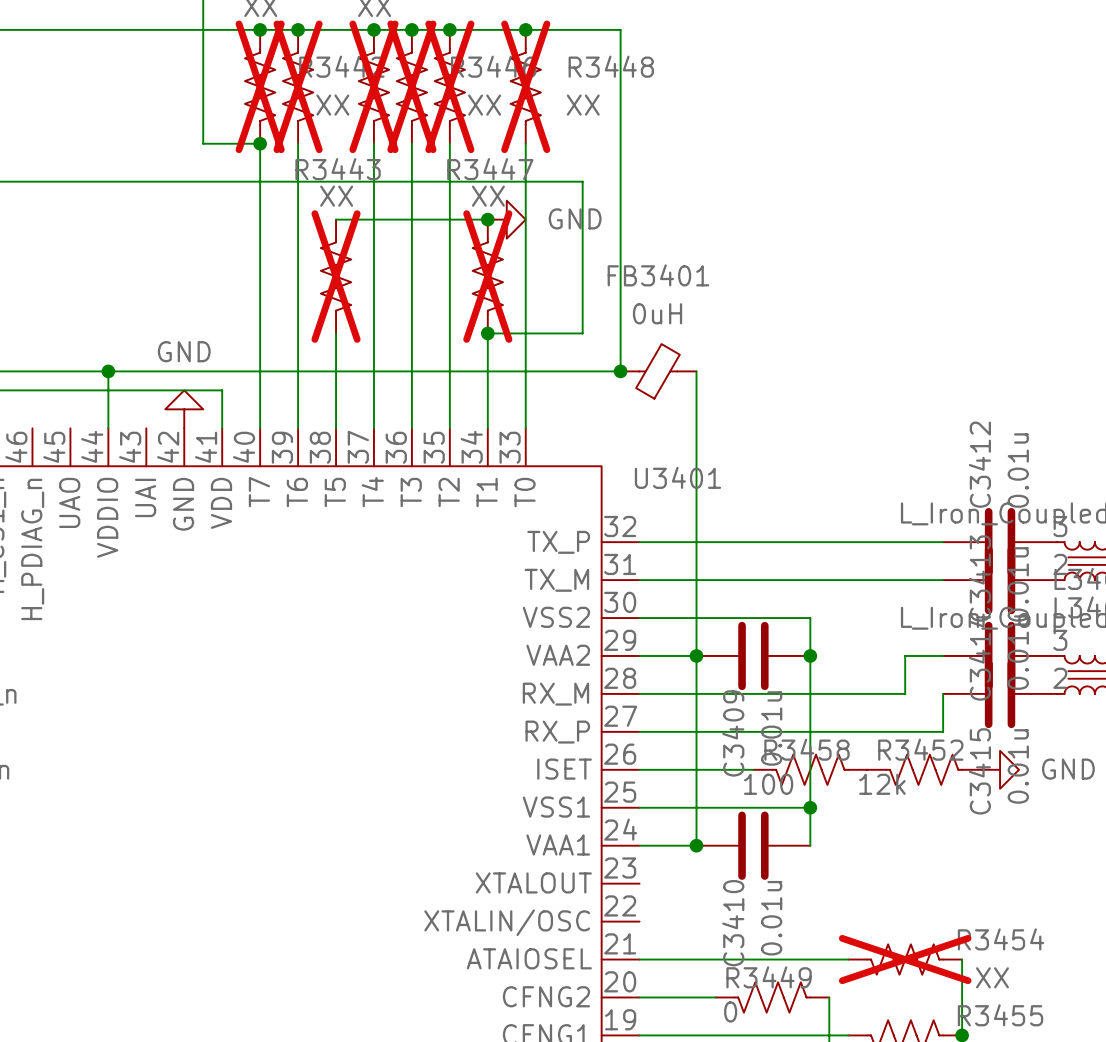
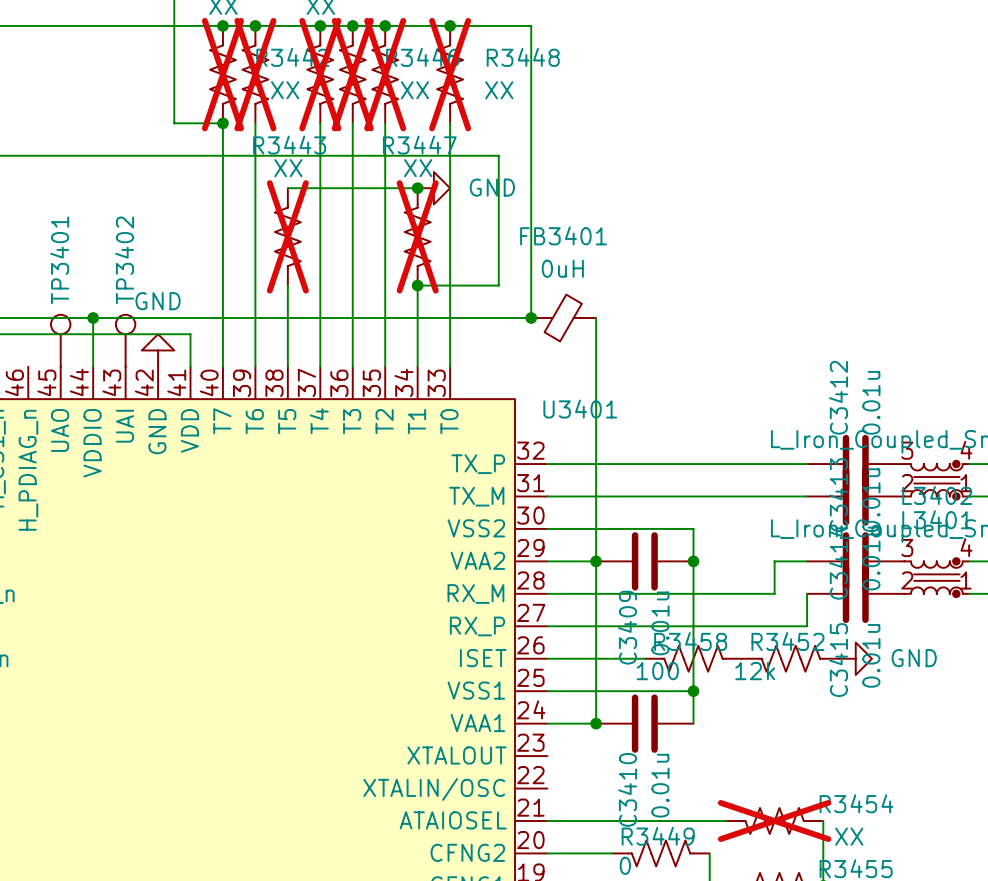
TP3401: none -> (60, 340)
TP3402: none -> (125, 340)

